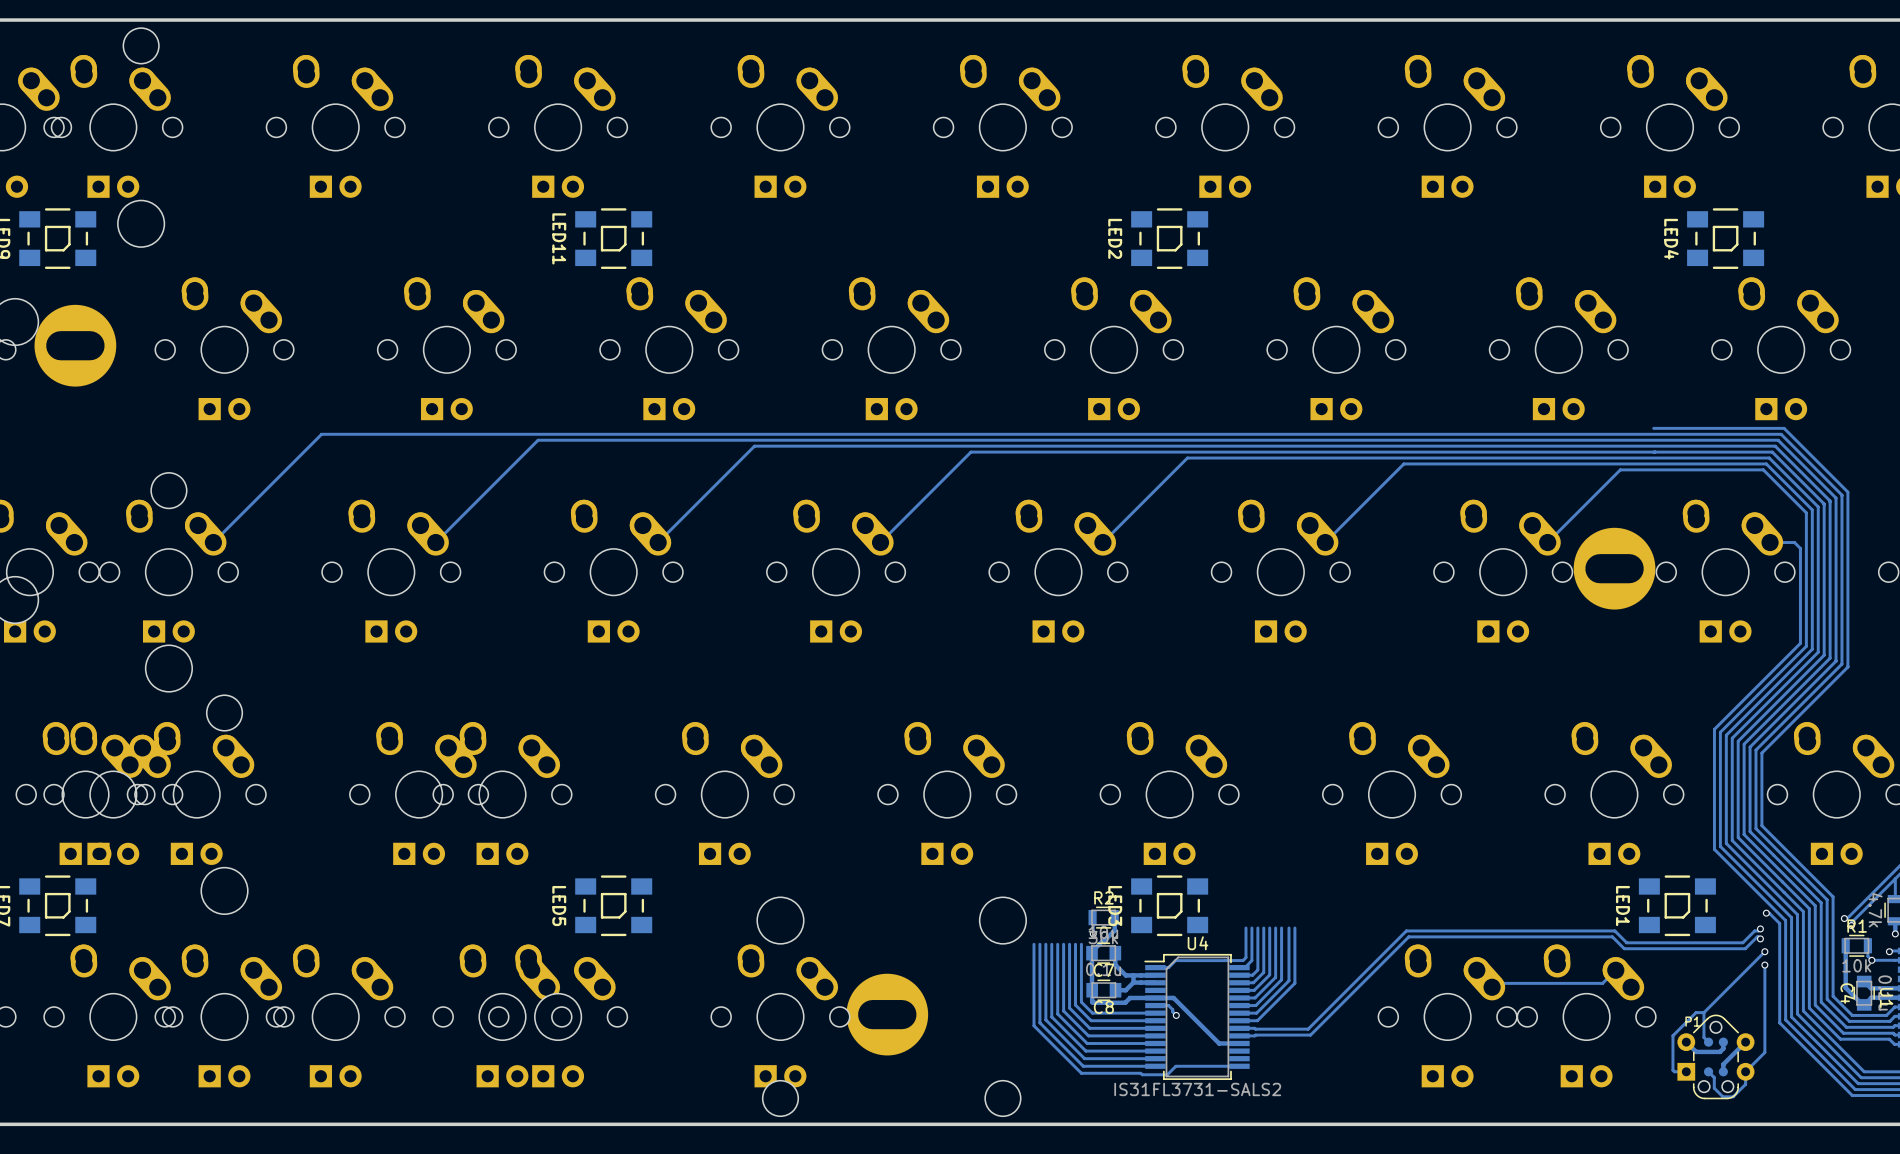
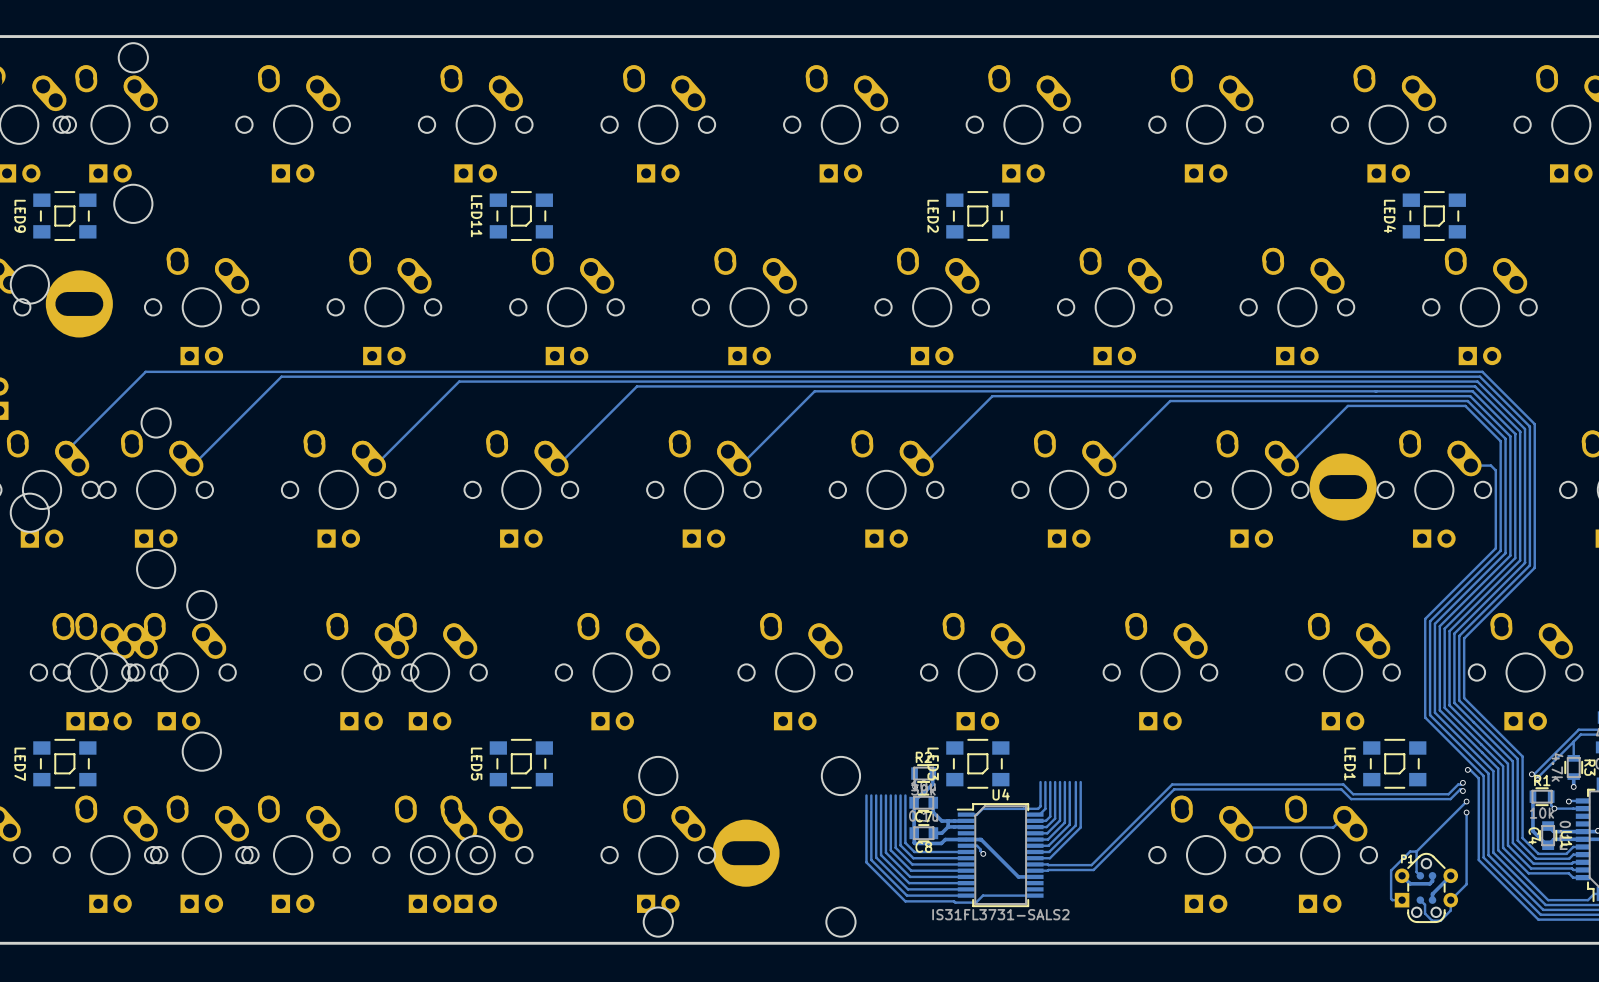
track: none -> (1375, 371) (145, 371) (65, 451)

